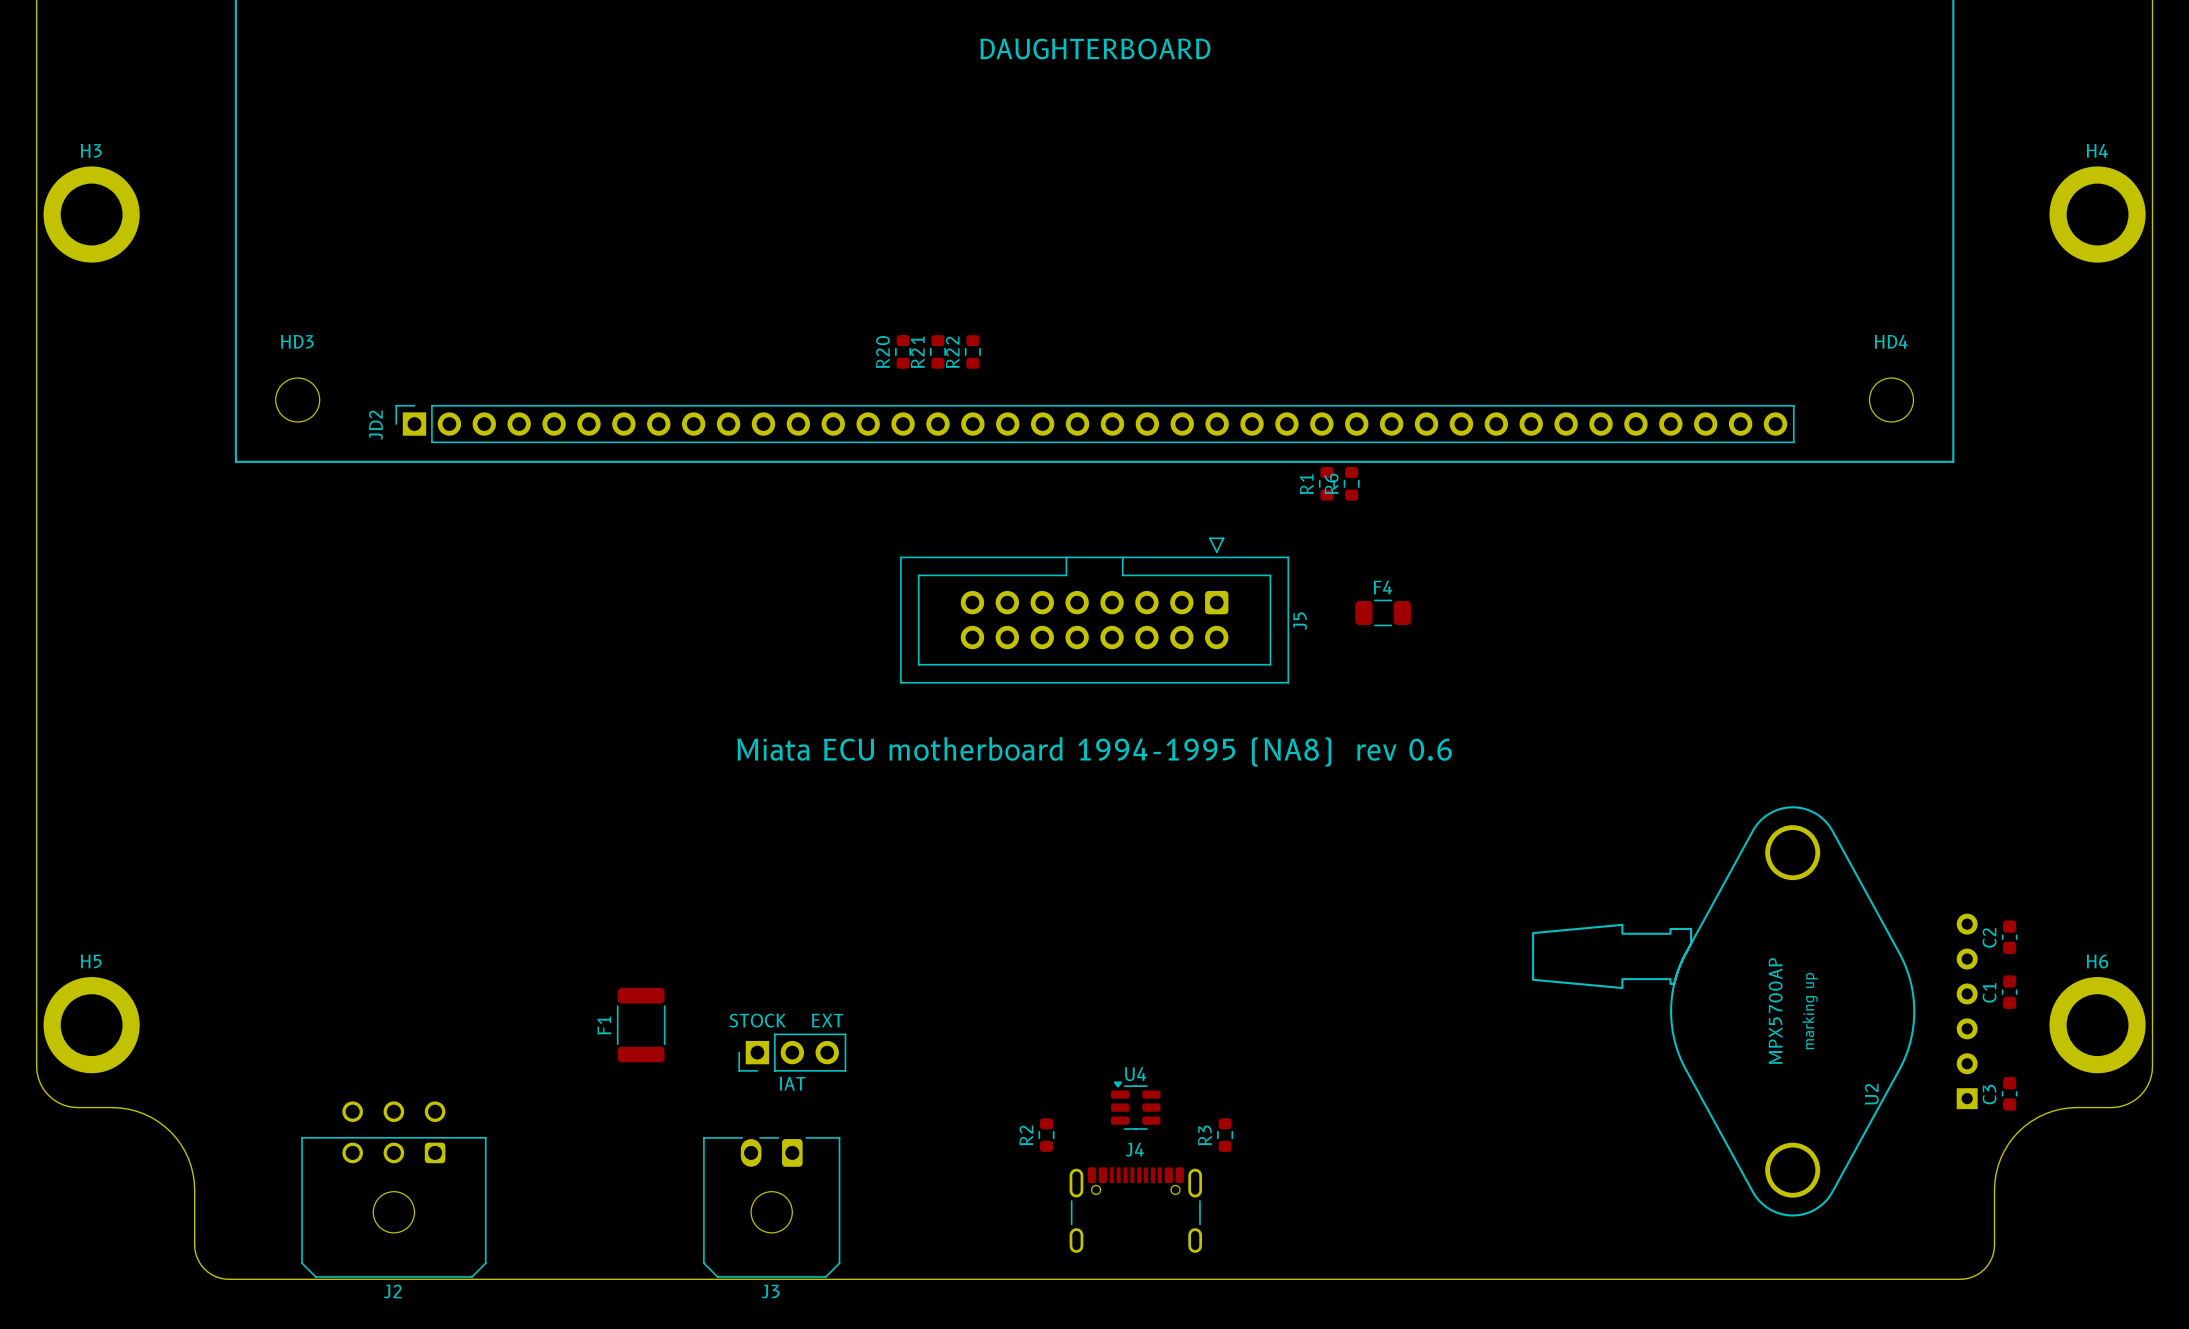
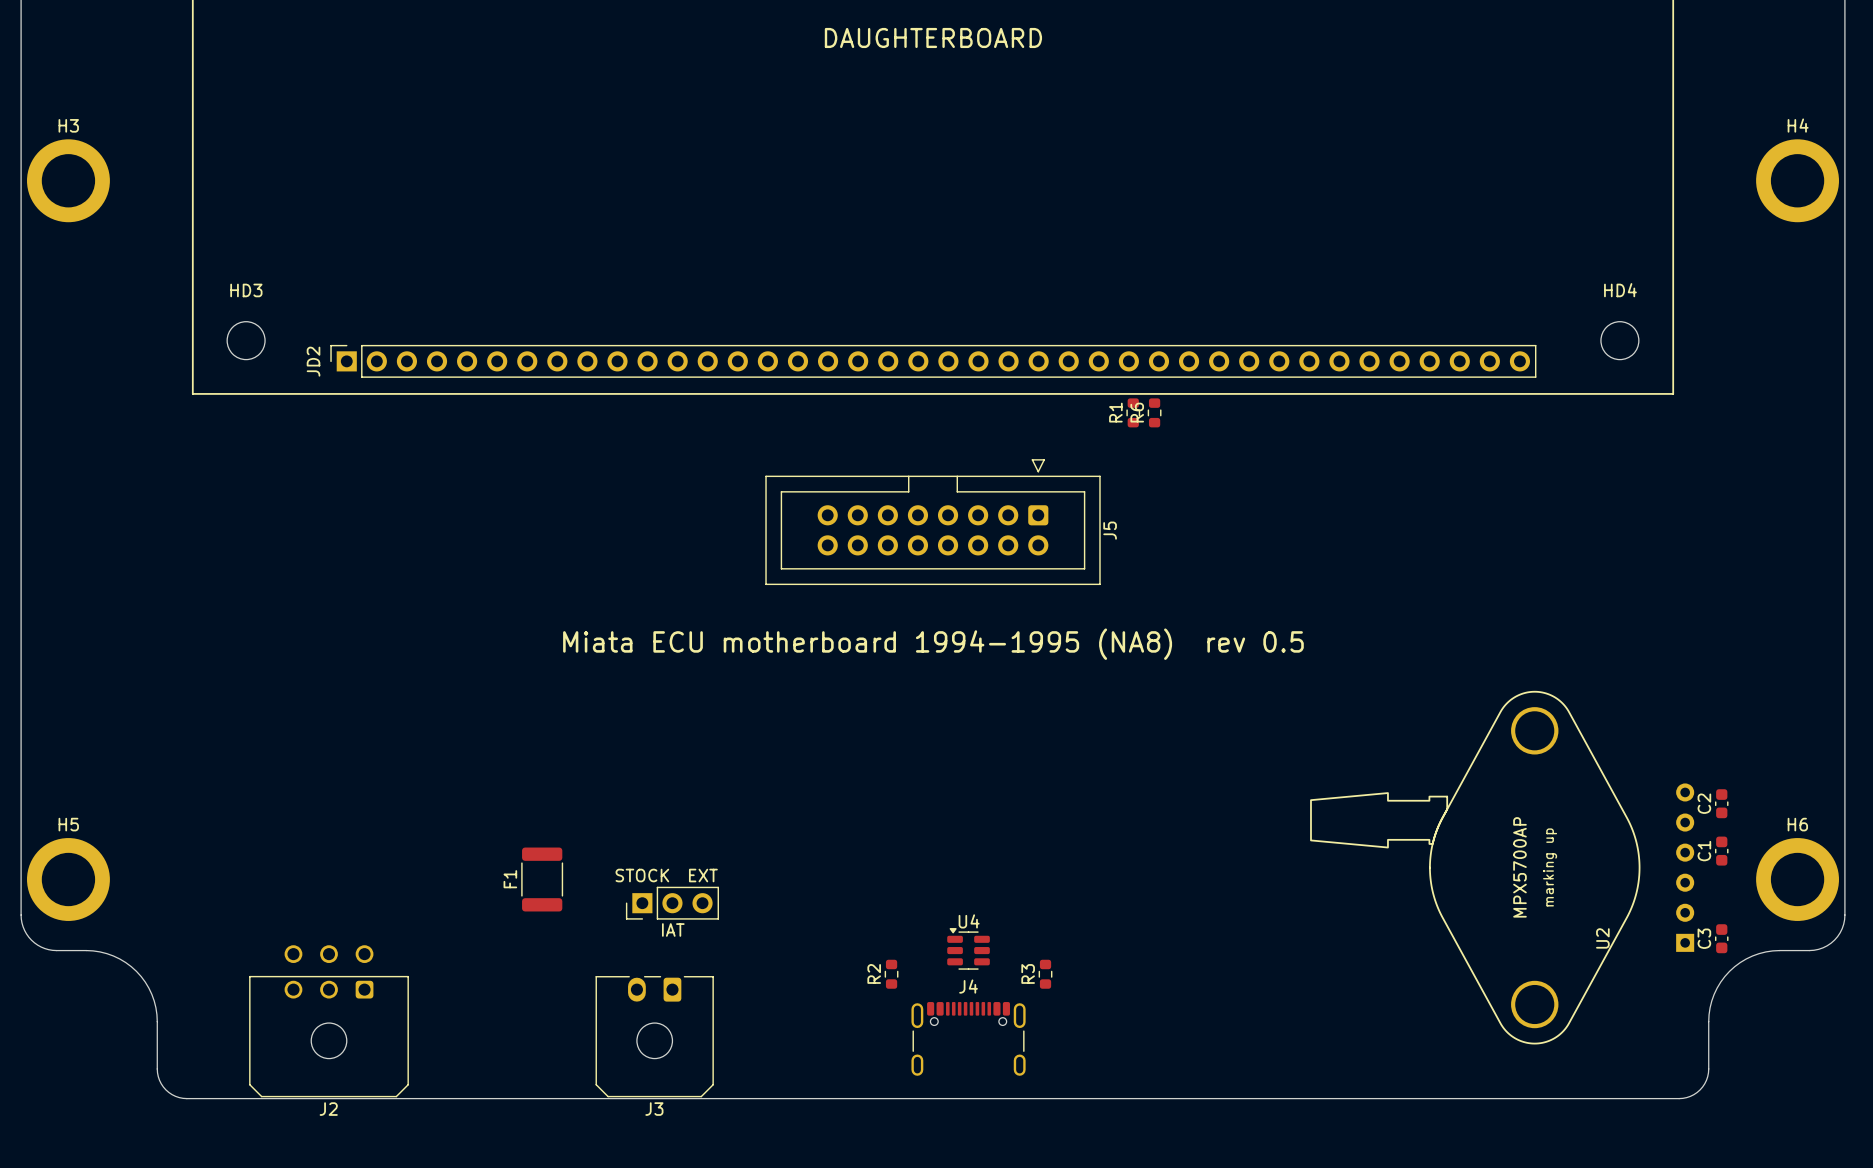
R20: (903, 351) -> none
R21: (937, 351) -> none
R22: (972, 351) -> none
F4: (1383, 612) -> none
text: Miata ECU motherboard 1994-1995 (NA8) rev 0.6 (1094, 751) -> Miata ECU motherboard 1994-1995 (NA8) rev 0.5 (933, 644)

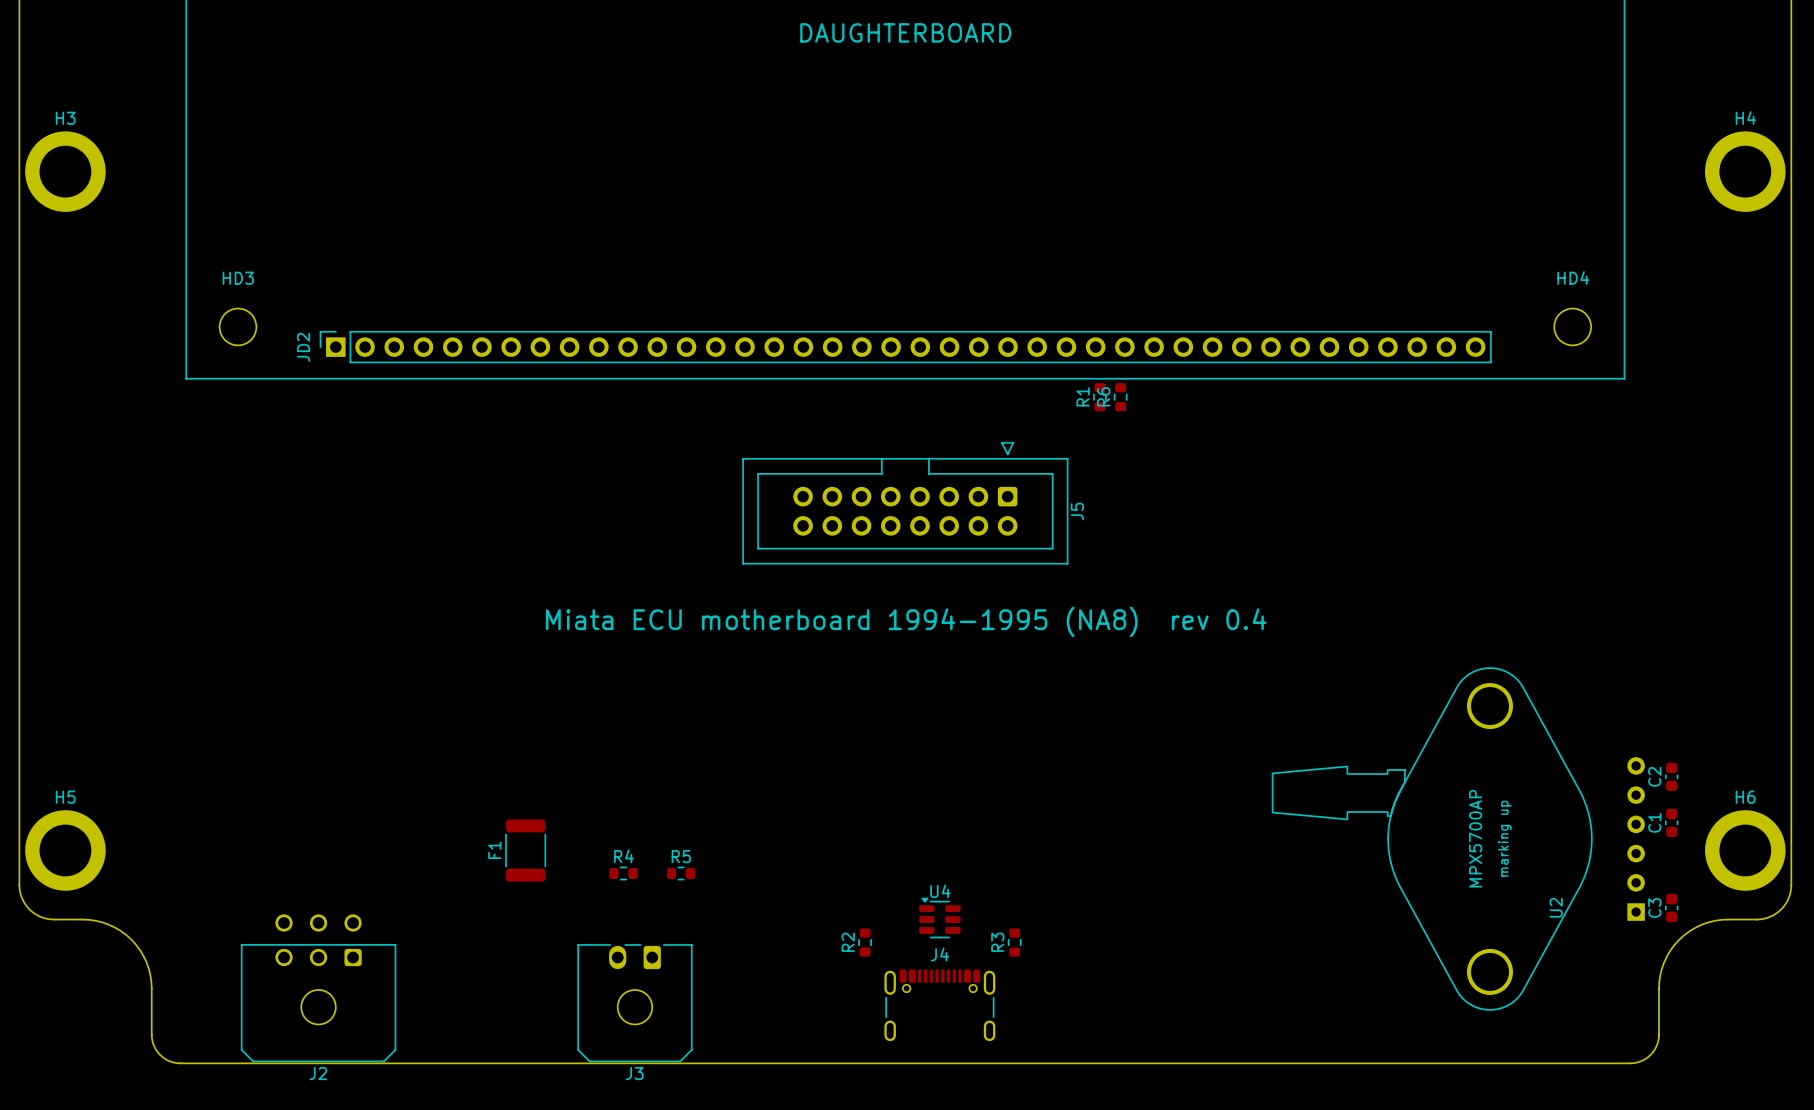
text: Miata ECU motherboard 1994-1995 (NA8) rev 0.5 (933, 644) -> Miata ECU motherboard 1994-1995 (NA8) rev 0.4 (906, 621)
text: STOCK (642, 875) -> none
text: EXT (703, 875) -> none
R4: none -> (623, 873)
part: (672, 903) -> none
R5: none -> (680, 873)
text: IAT (673, 929) -> none

